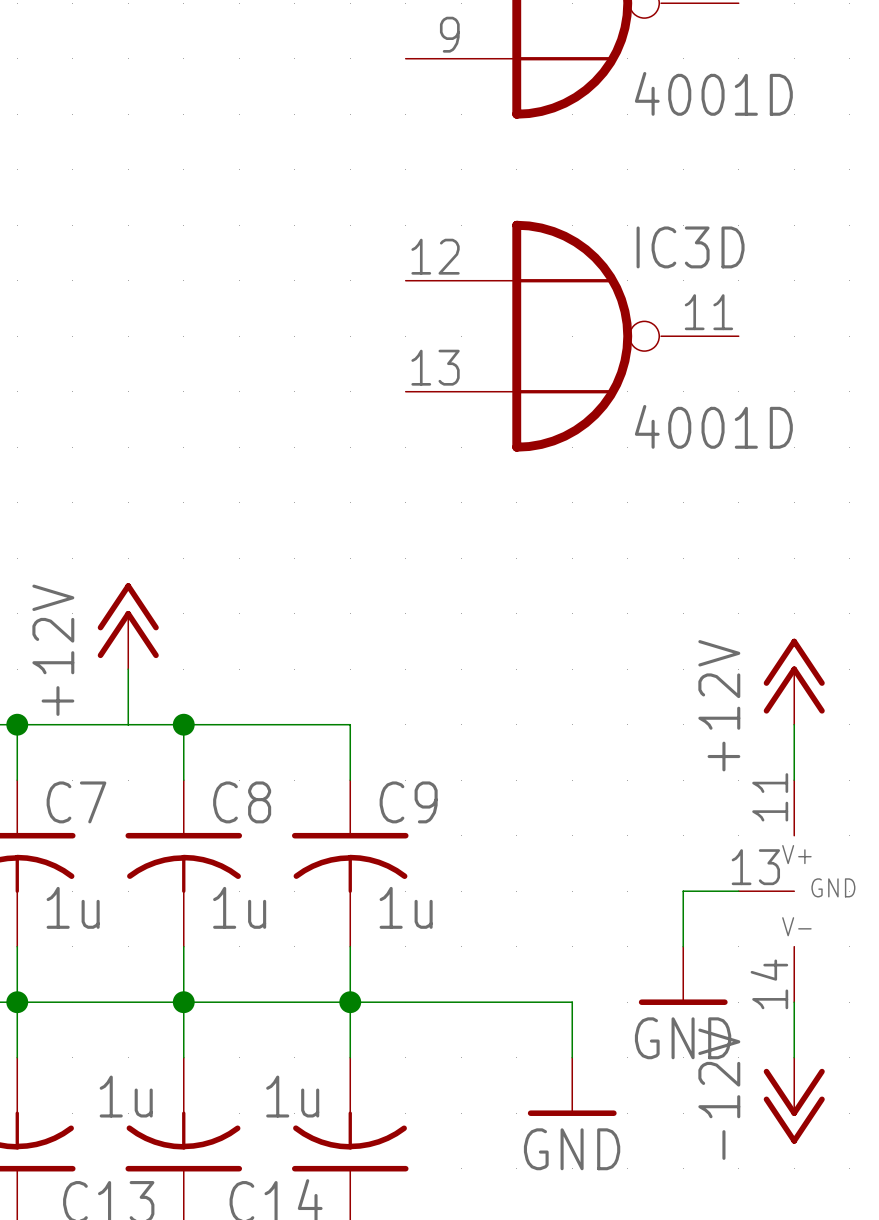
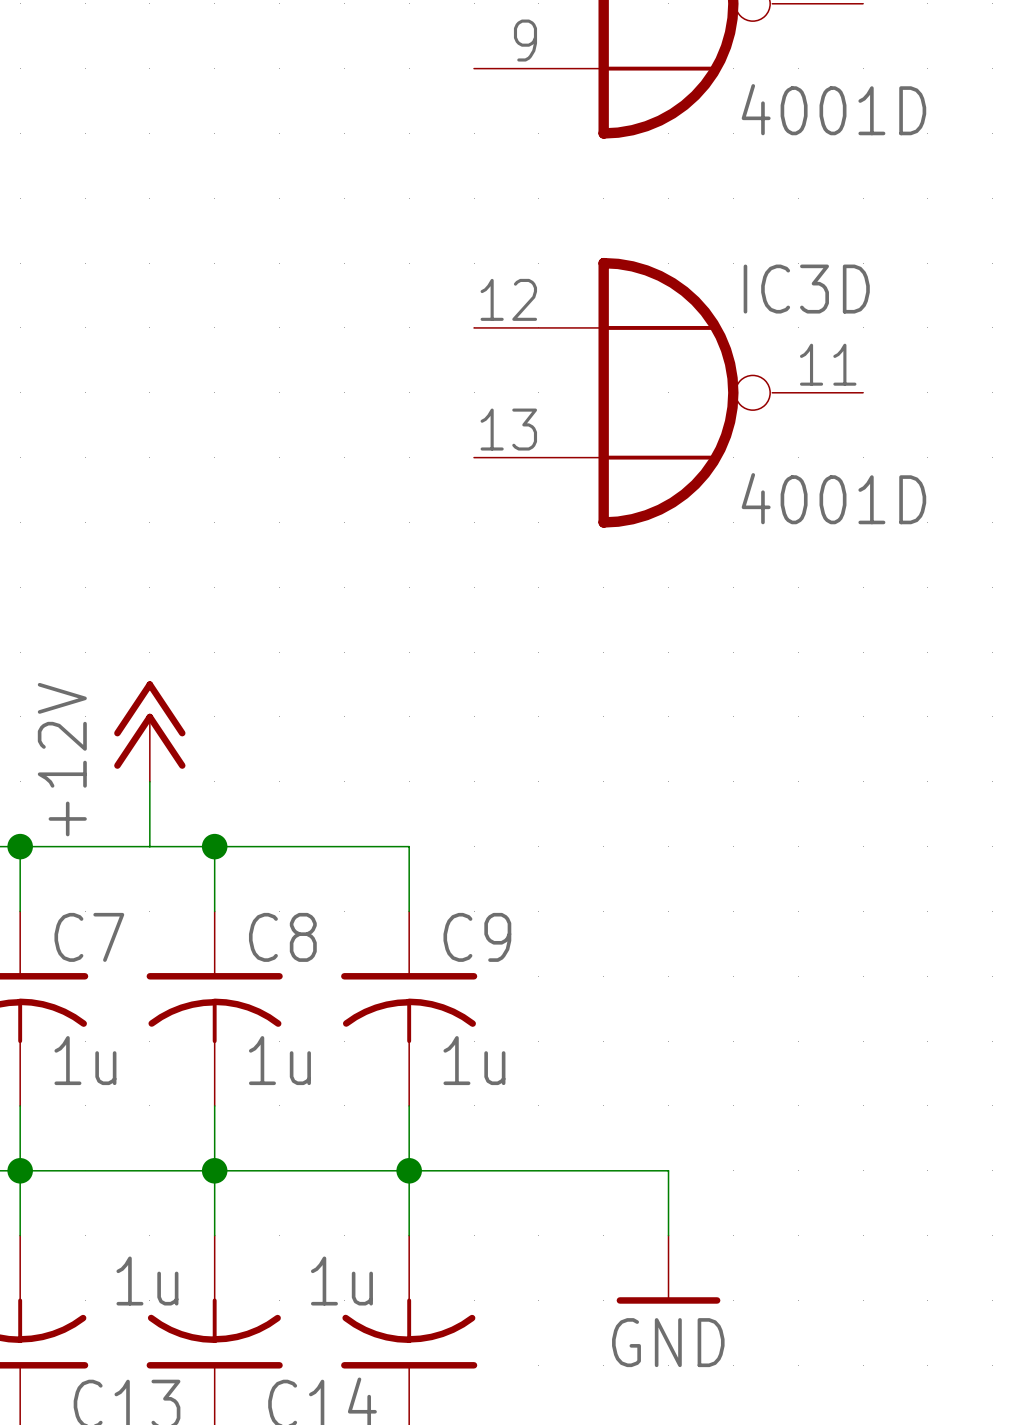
power symbol: +12V (794, 681) -> none
wire: (794, 724) (794, 780) -> none
wire: (738, 891) (683, 891) (683, 946) -> none
part: (766, 891) -> none
power symbol: GND (683, 975) -> none
wire: (794, 1002) (794, 1057) -> none
power symbol: -12V (794, 1100) -> none

